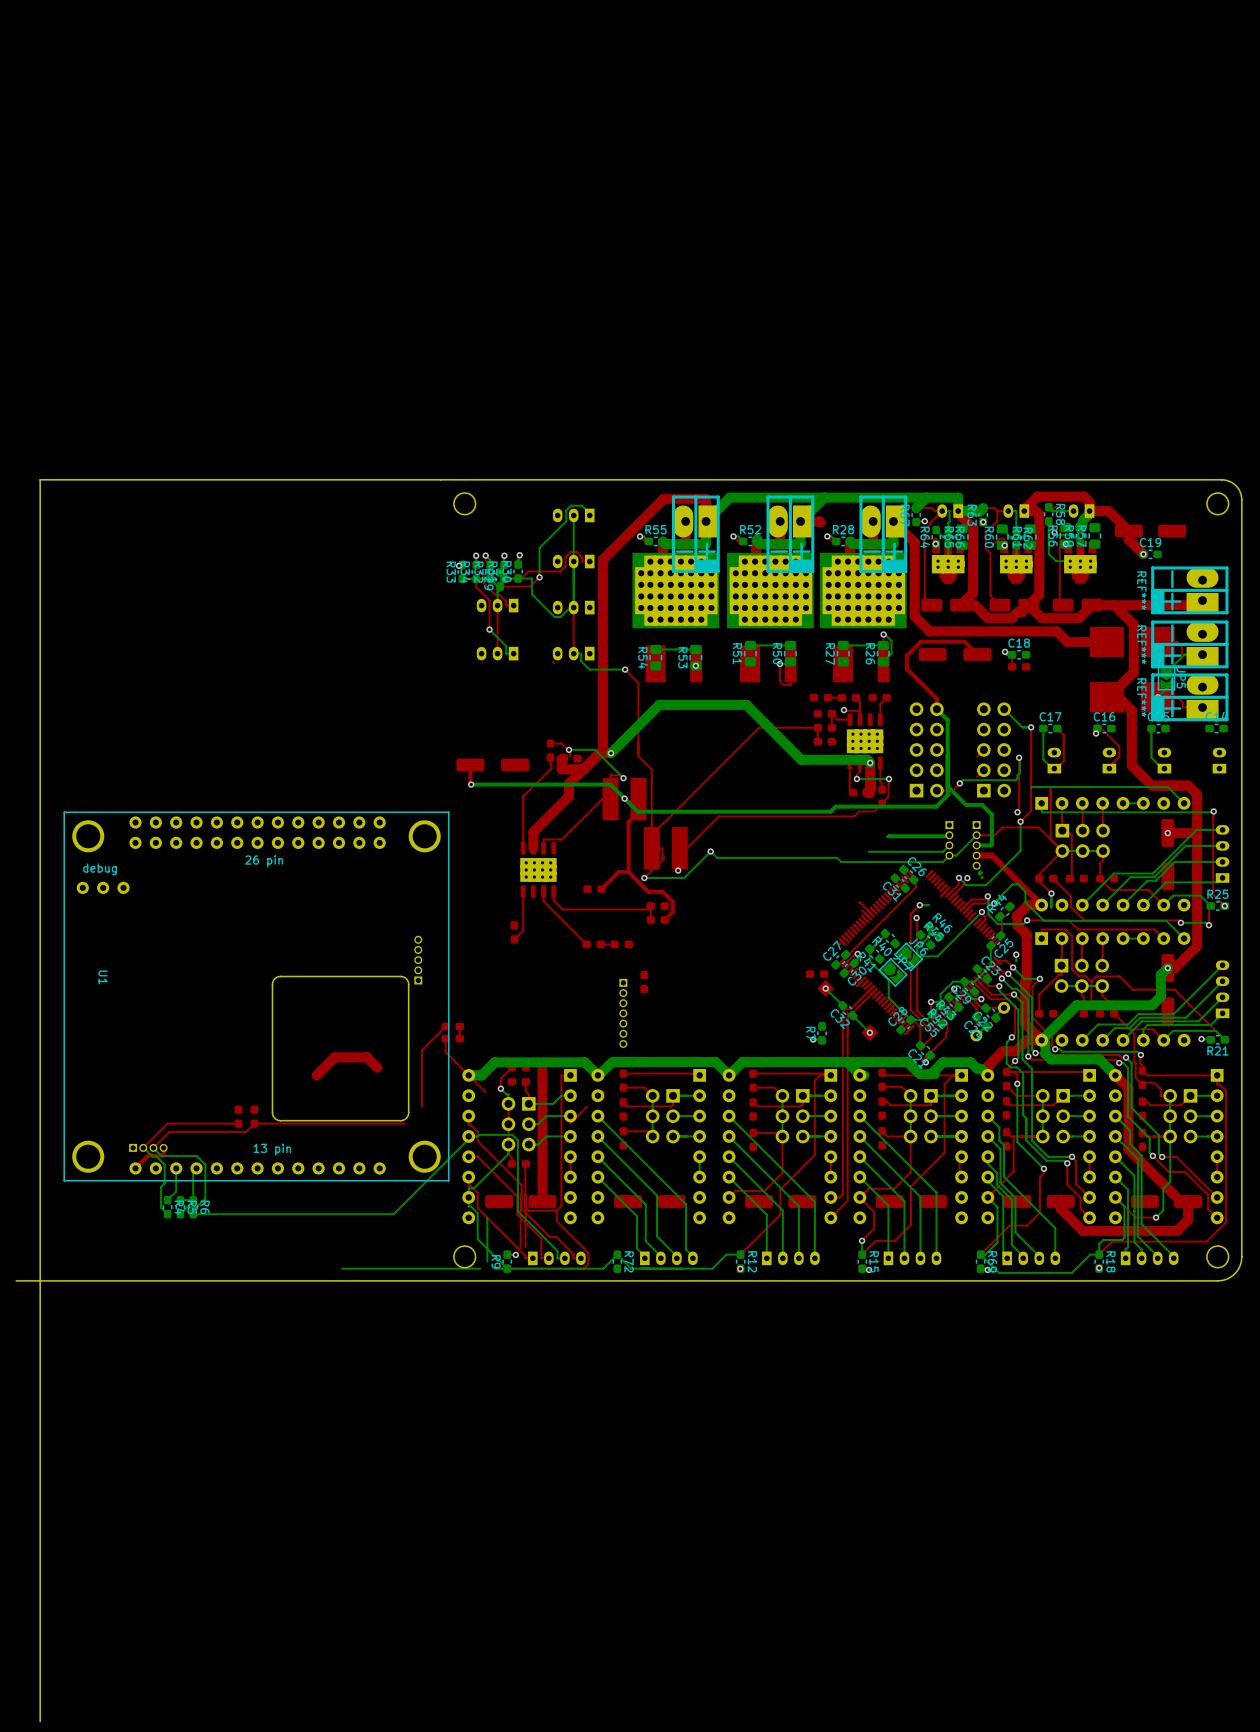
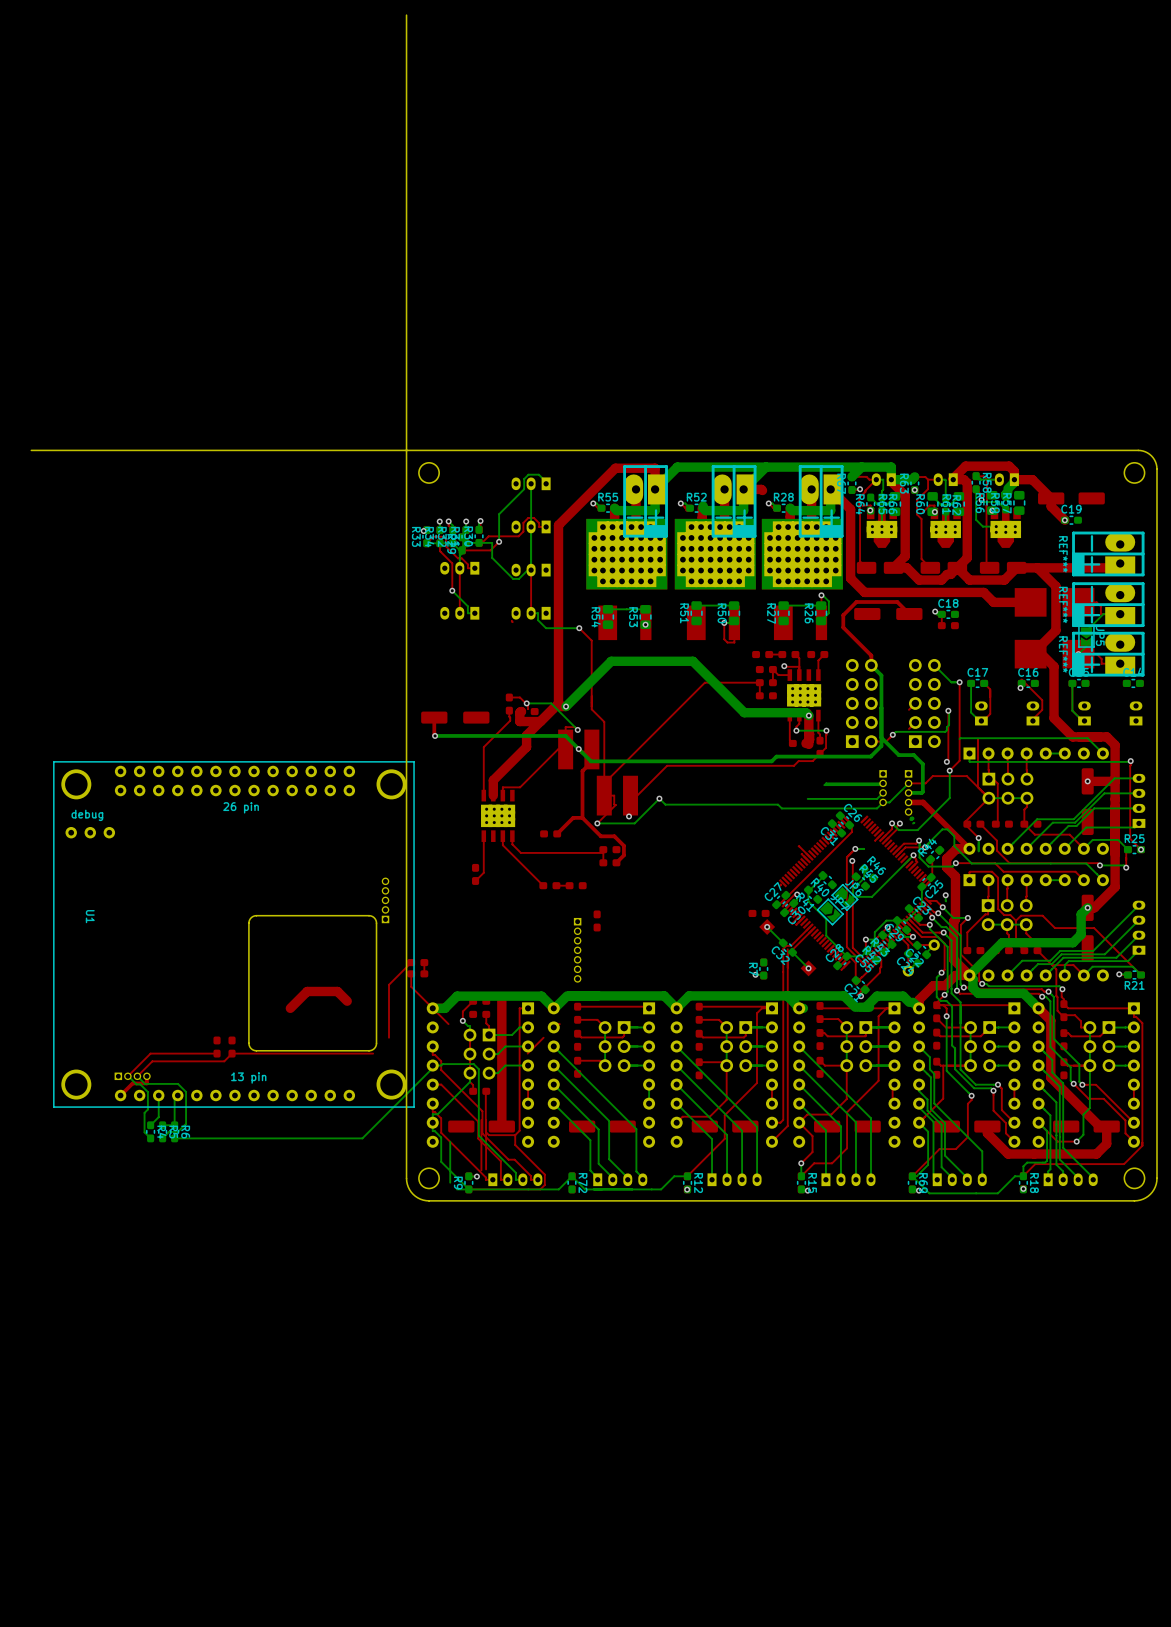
board edge: (40, 479) (40, 1721) -> none
bottom track: (480, 1268) (342, 1268) -> none
board edge: (464, 1280) (16, 1280) -> (429, 1200) (420, 1199) (413, 1194) (408, 1186) (406, 1178) (406, 15)

